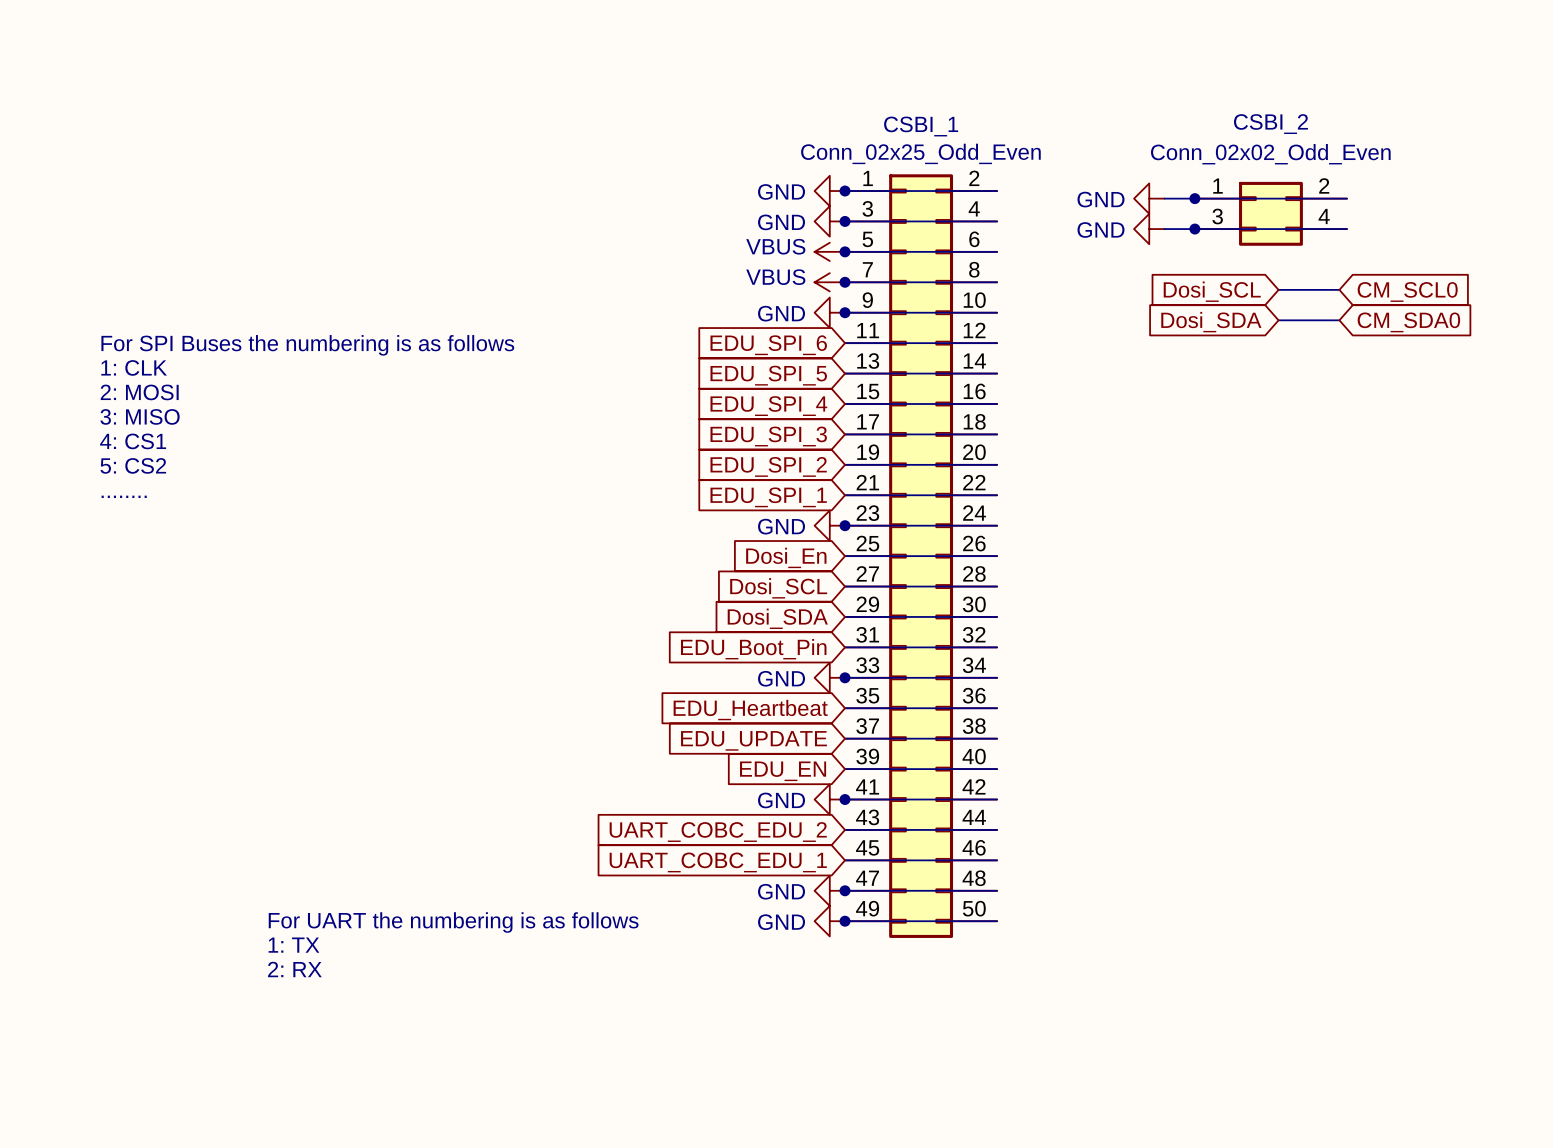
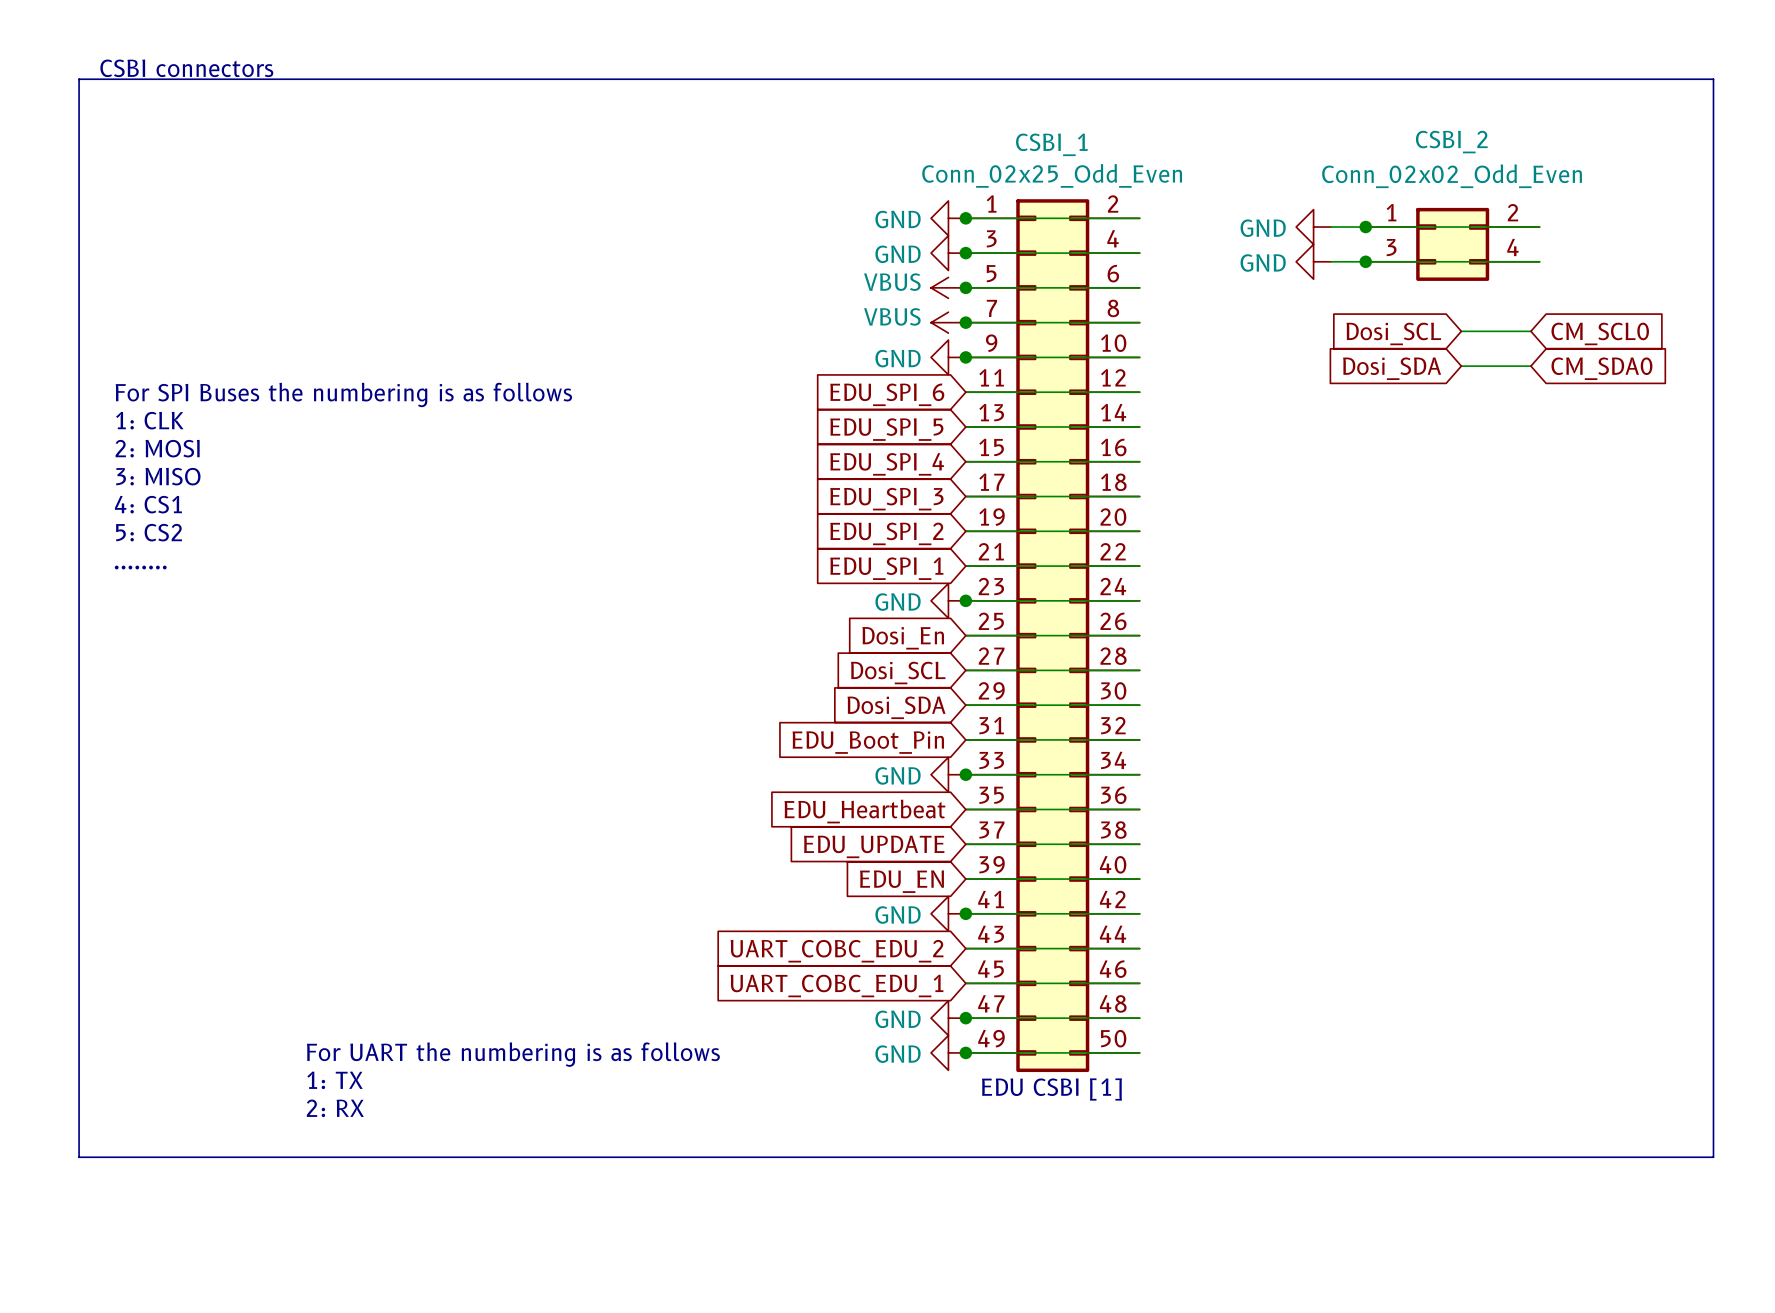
text: none -> CSBI connectors (186, 68)
line: none -> (79, 79) (1713, 79) (1713, 1157) (79, 1157) (79, 79)
text: none -> EDU CSBI [1] (1051, 1089)

